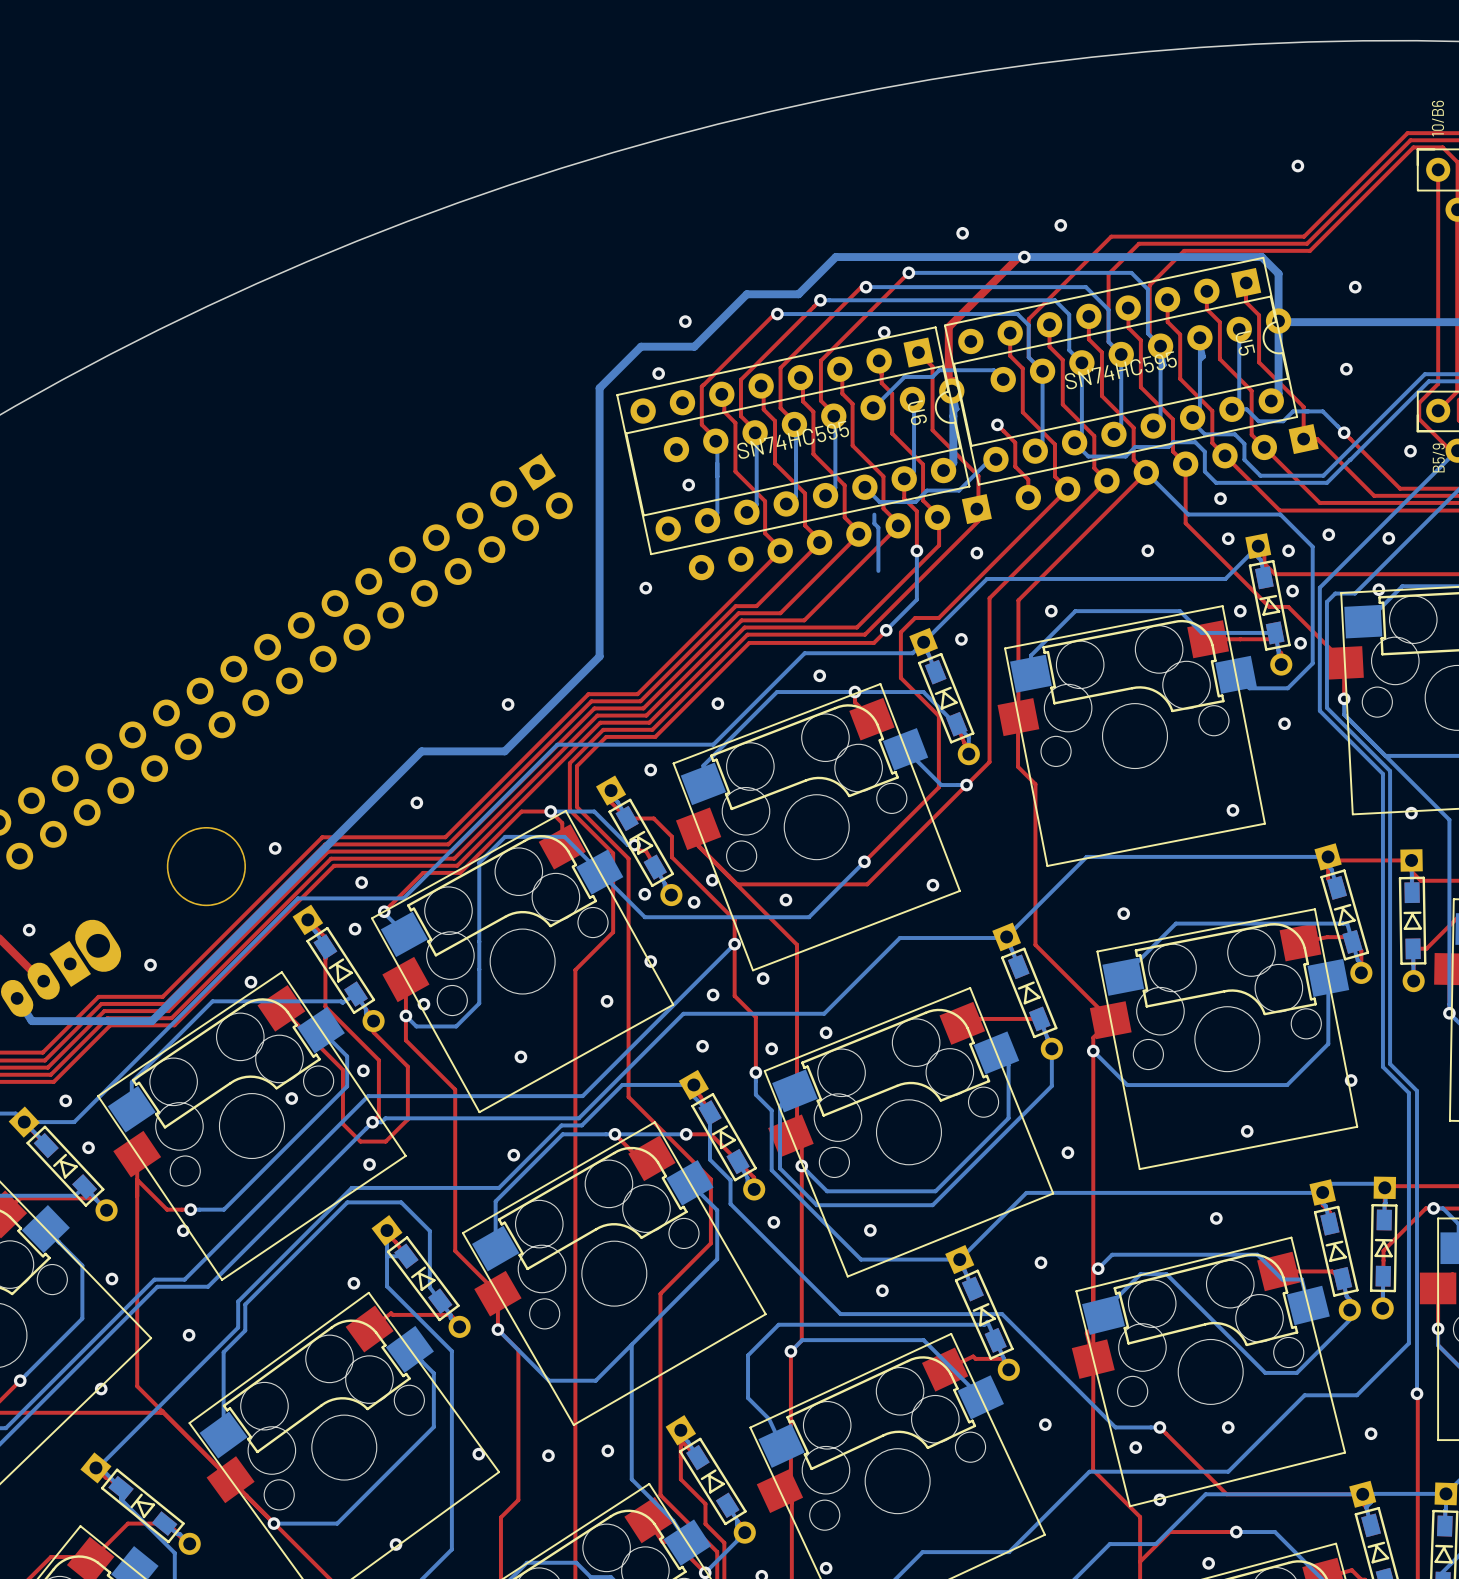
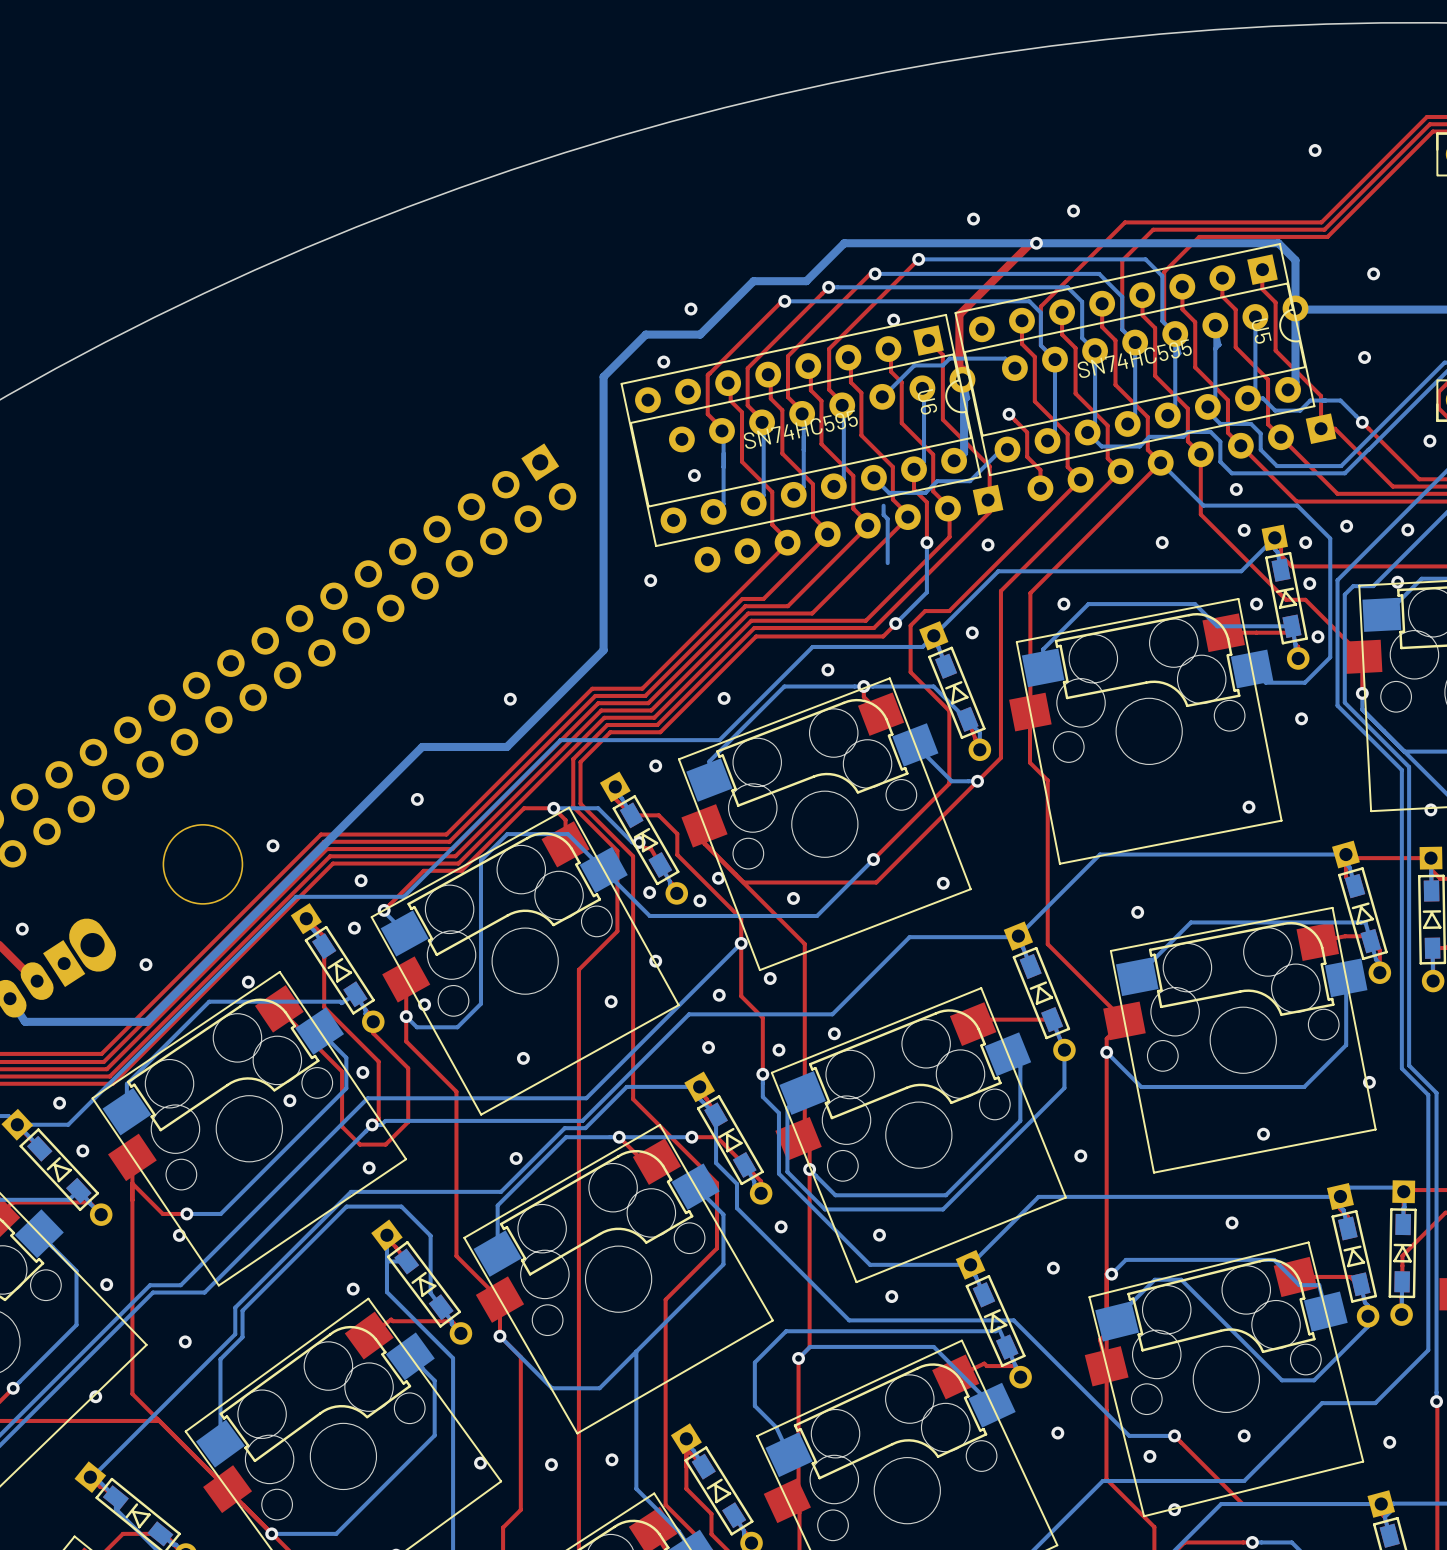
top track: (162, 996) (98, 996) (42, 1052) -> (158, 997) (101, 1053) (36, 1053)
top track: (165, 1003) (101, 1003) (44, 1060) -> (161, 1004) (103, 1061) (38, 1061)
top track: (168, 1011) (104, 1011) (47, 1067) -> (164, 1011) (106, 1069) (41, 1069)
top track: (171, 1018) (107, 1018) (50, 1074) -> (167, 1018) (109, 1076) (44, 1076)
top track: (174, 1025) (110, 1025) (53, 1081) -> (170, 1026) (112, 1083) (47, 1083)

